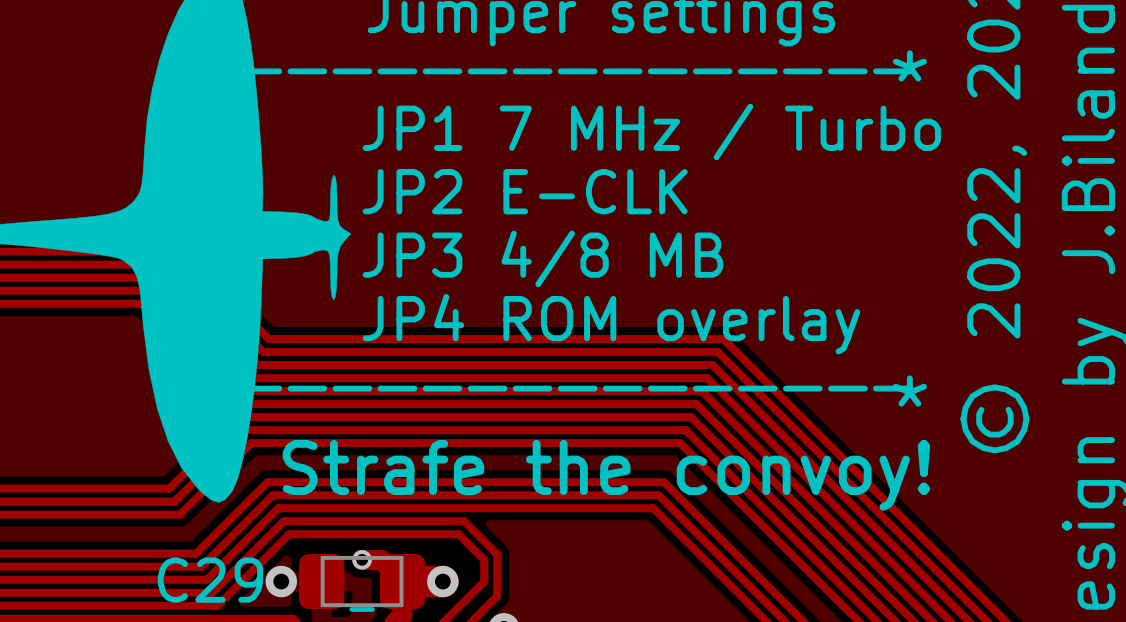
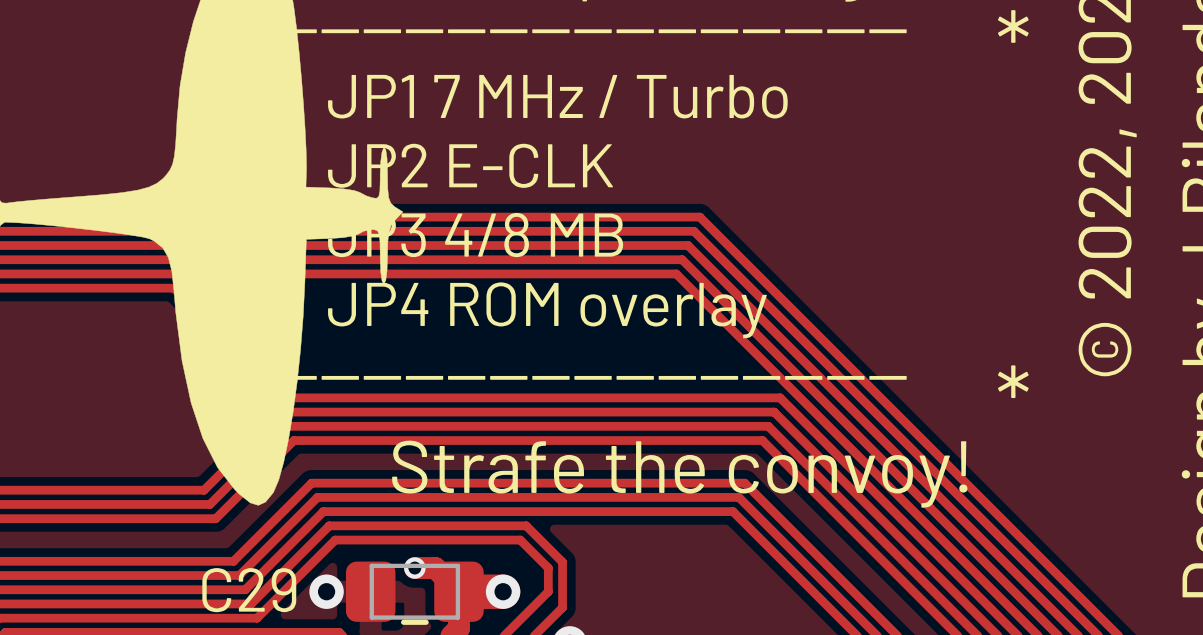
track: (168, 238) (268, 339) (723, 339) -> (203, 217) (699, 217) (809, 326)
track: (162, 251) (263, 352) (717, 352) -> (197, 231) (693, 231) (803, 341)
track: (157, 264) (257, 365) (712, 365) -> (191, 245) (688, 245) (797, 355)
track: (152, 277) (252, 378) (707, 378) -> (185, 259) (682, 259) (791, 369)
track: (146, 290) (247, 391) (701, 391) -> (179, 273) (676, 273) (786, 383)

